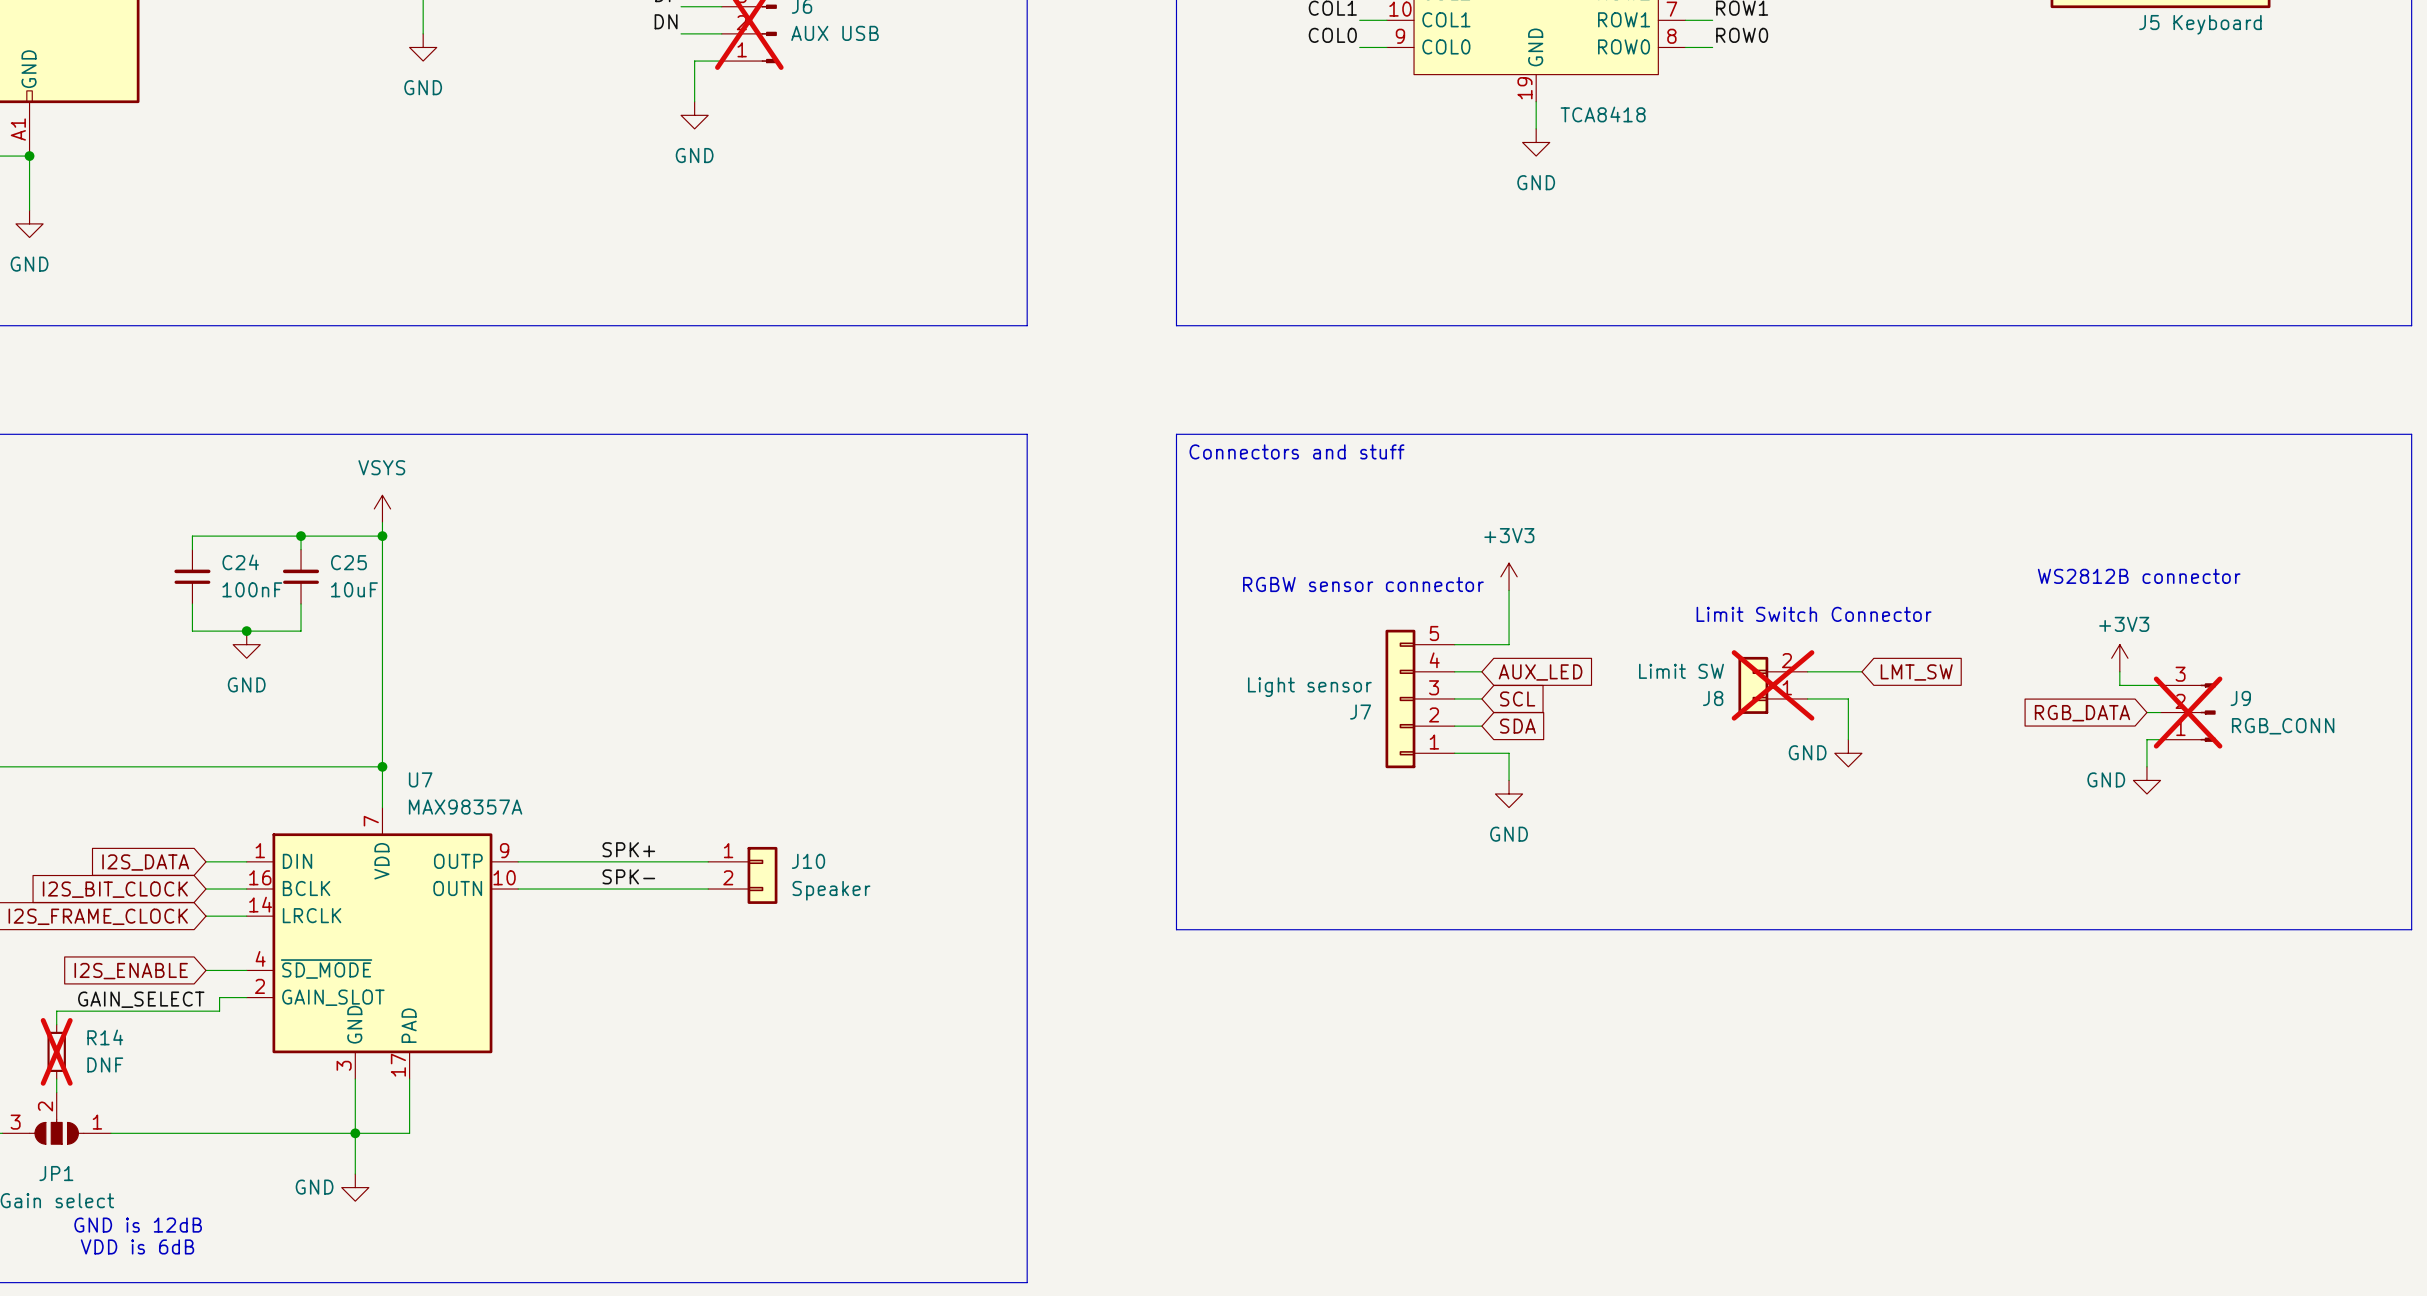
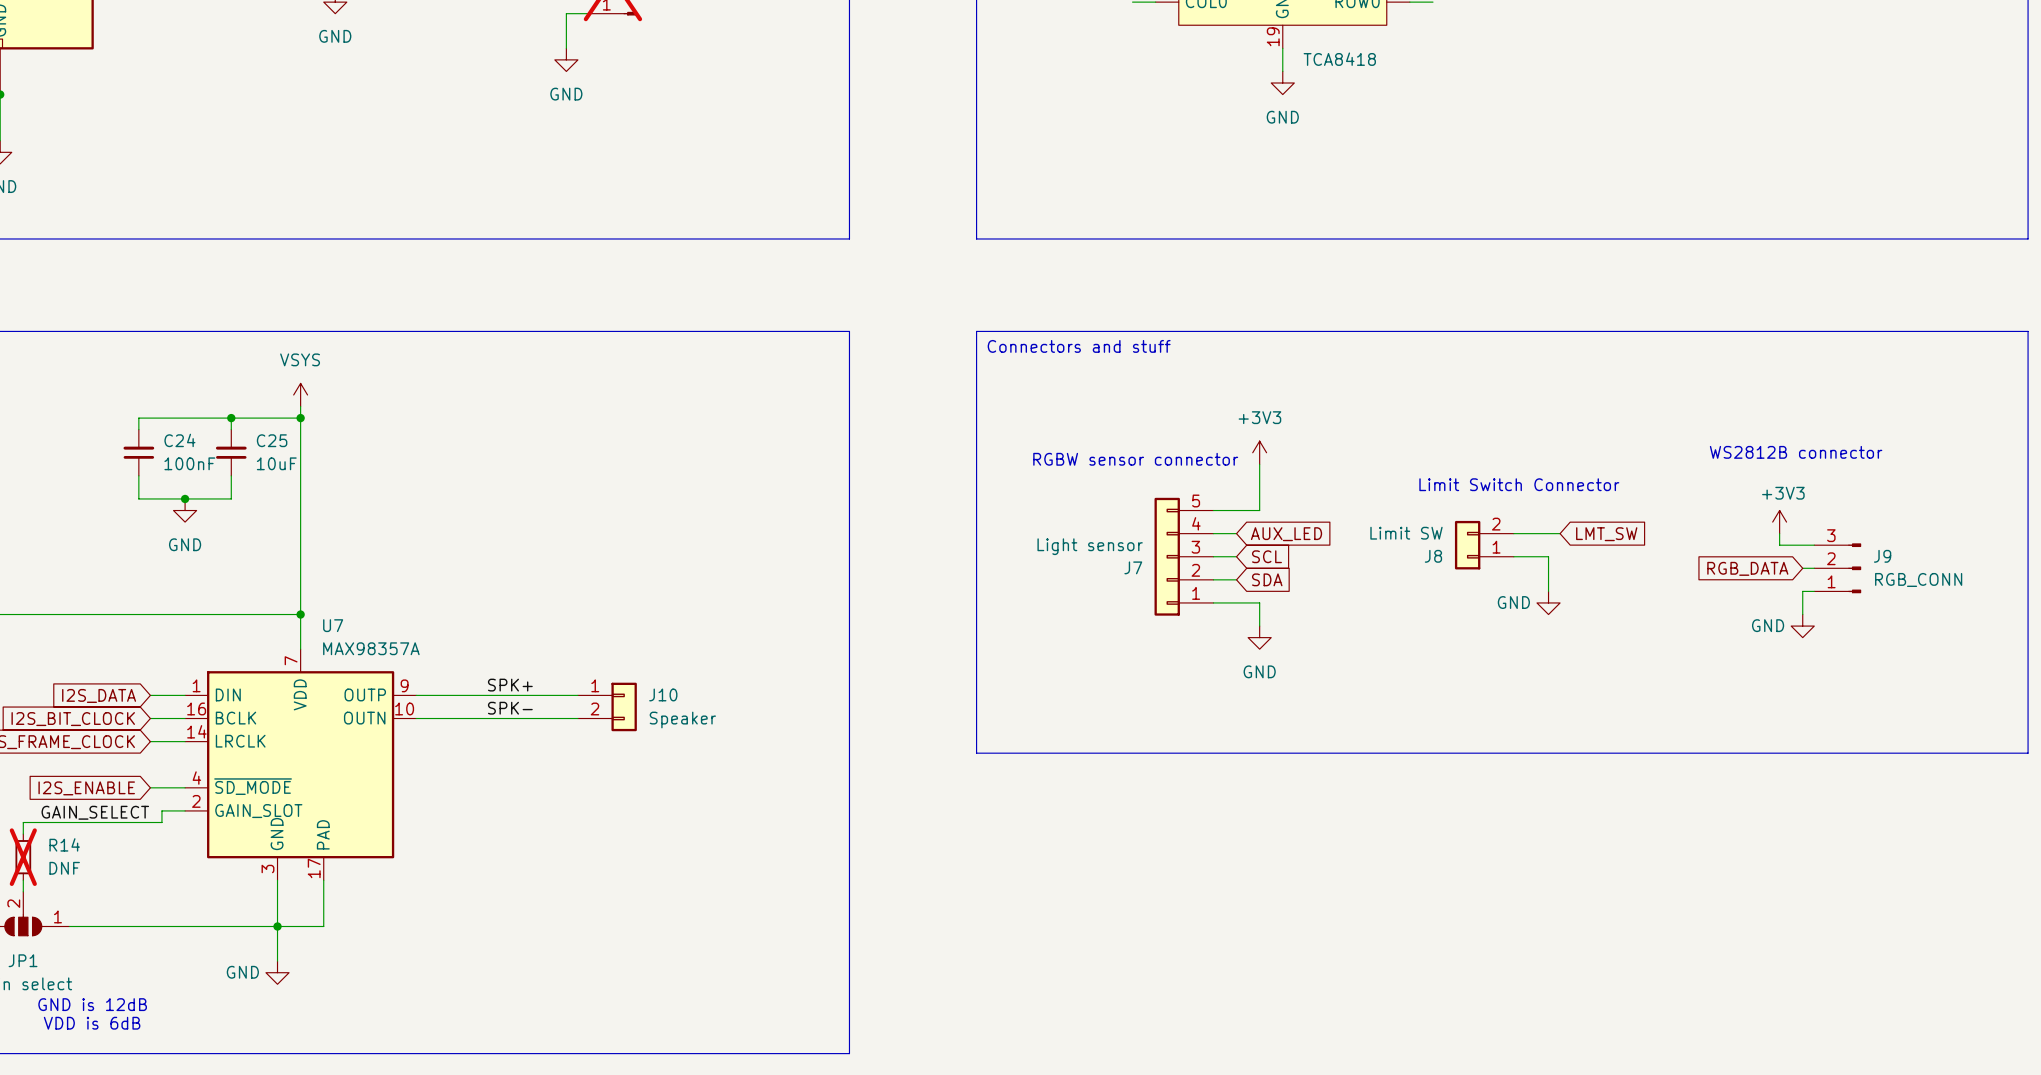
J8 do-not-place cross: (1773, 685) -> none
J9 do-not-place cross: (2188, 712) -> none

